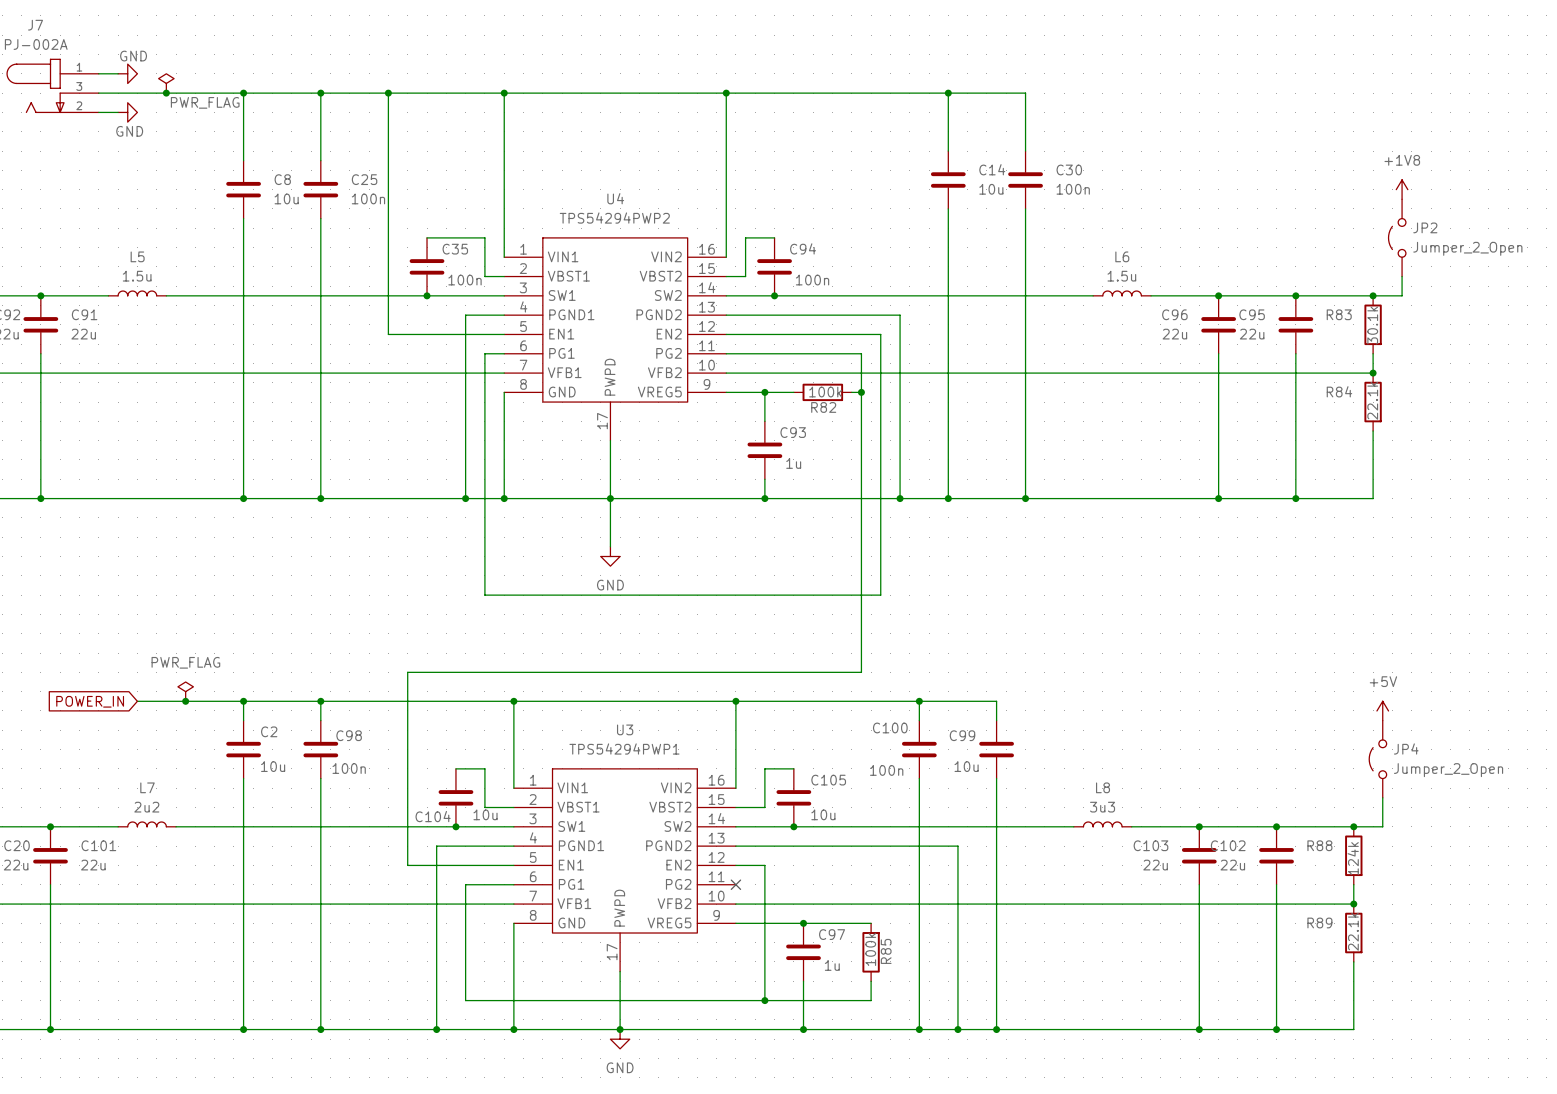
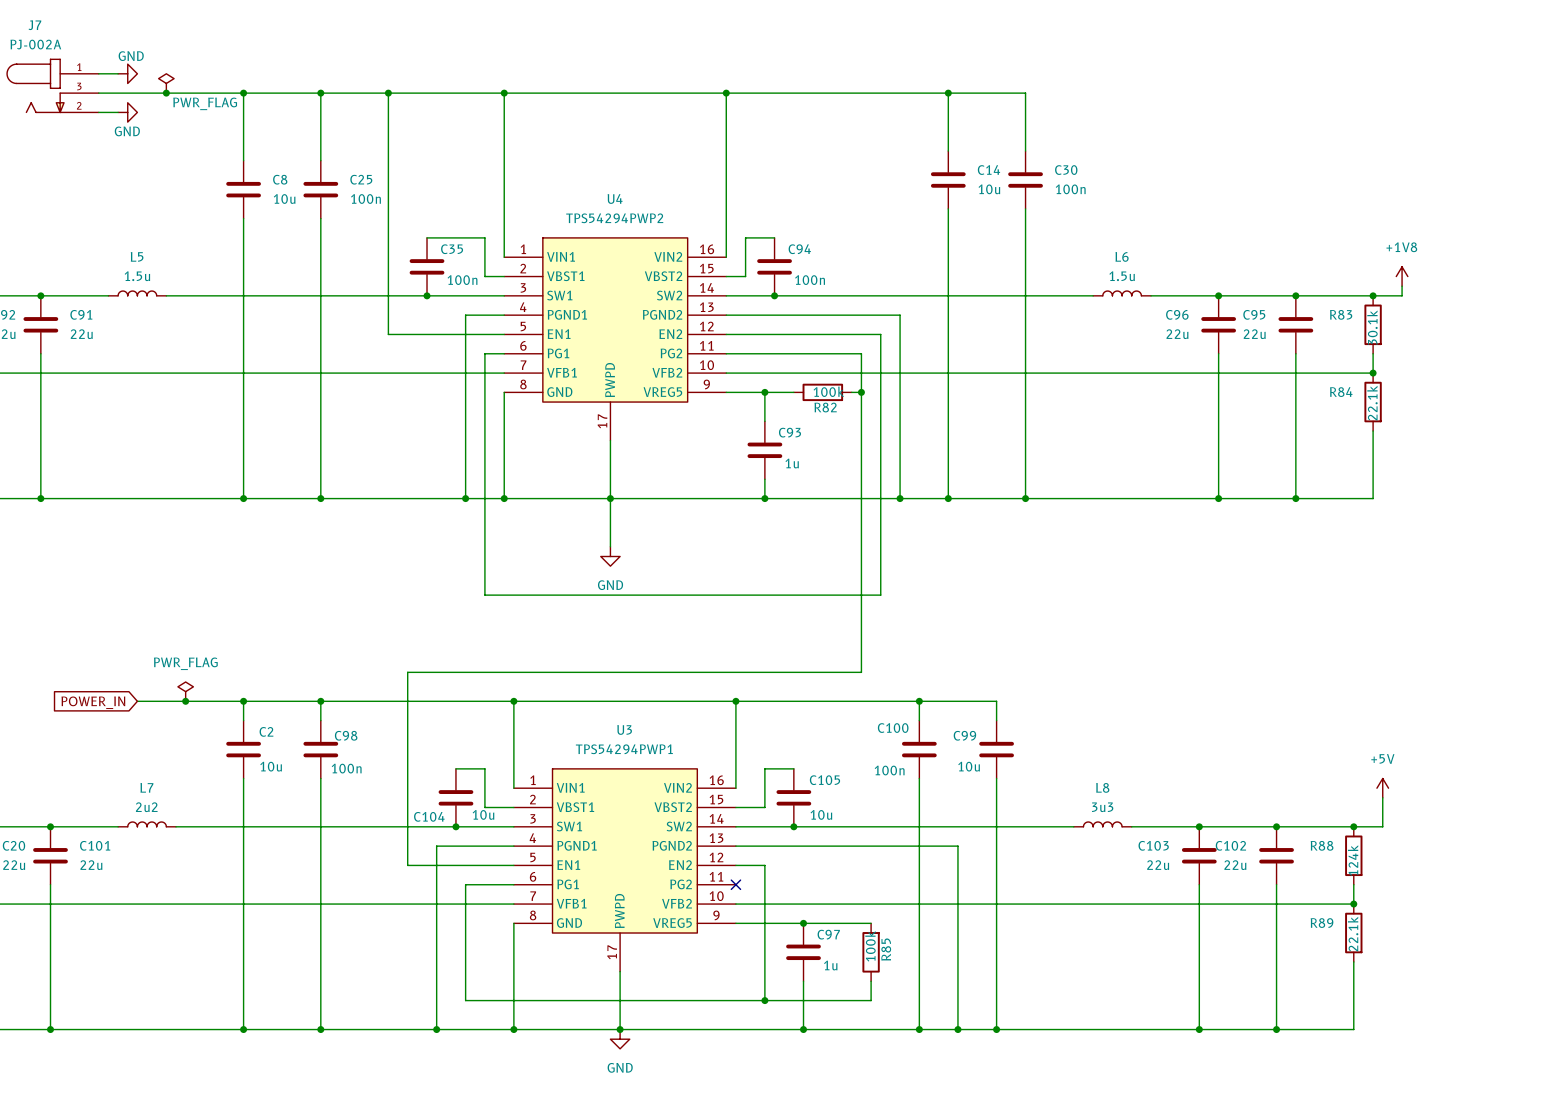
power symbol position: +1V8 (1402, 189) -> +1V8 (1402, 276)
JP2: Jumper_2_Open (1397, 237) -> none
power symbol position: +5V (1382, 710) -> +5V (1382, 788)
JP4: Jumper_2_Open (1377, 759) -> none

